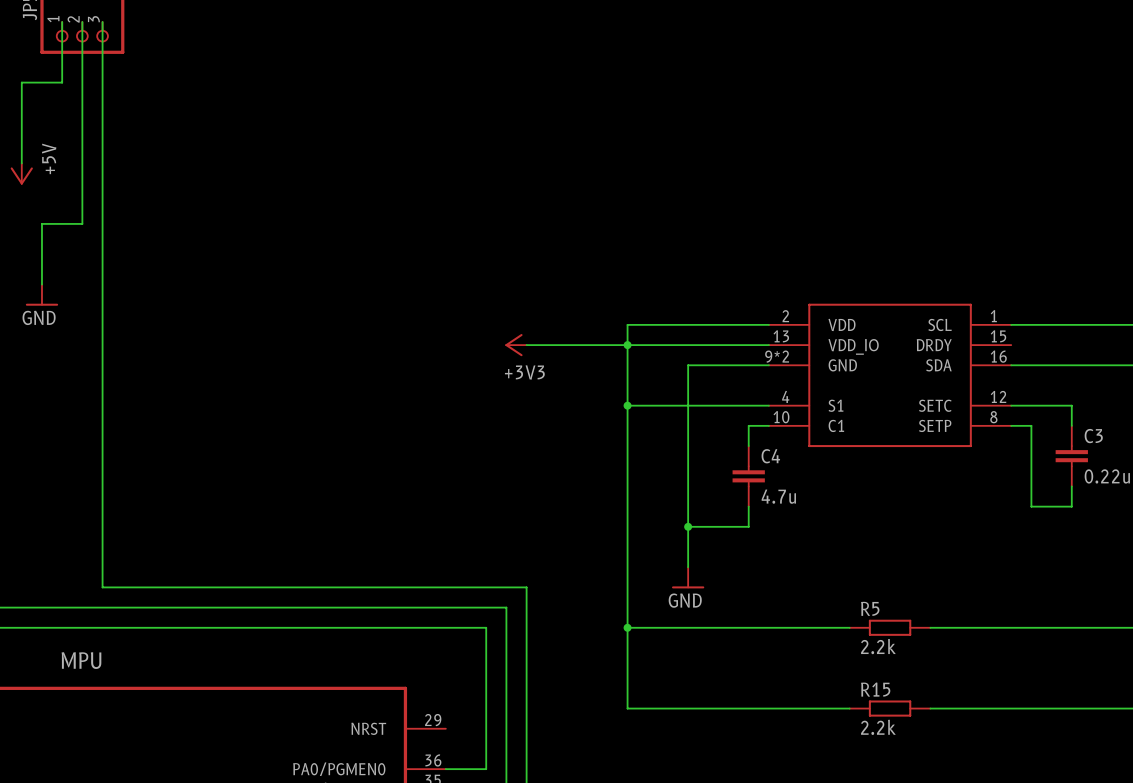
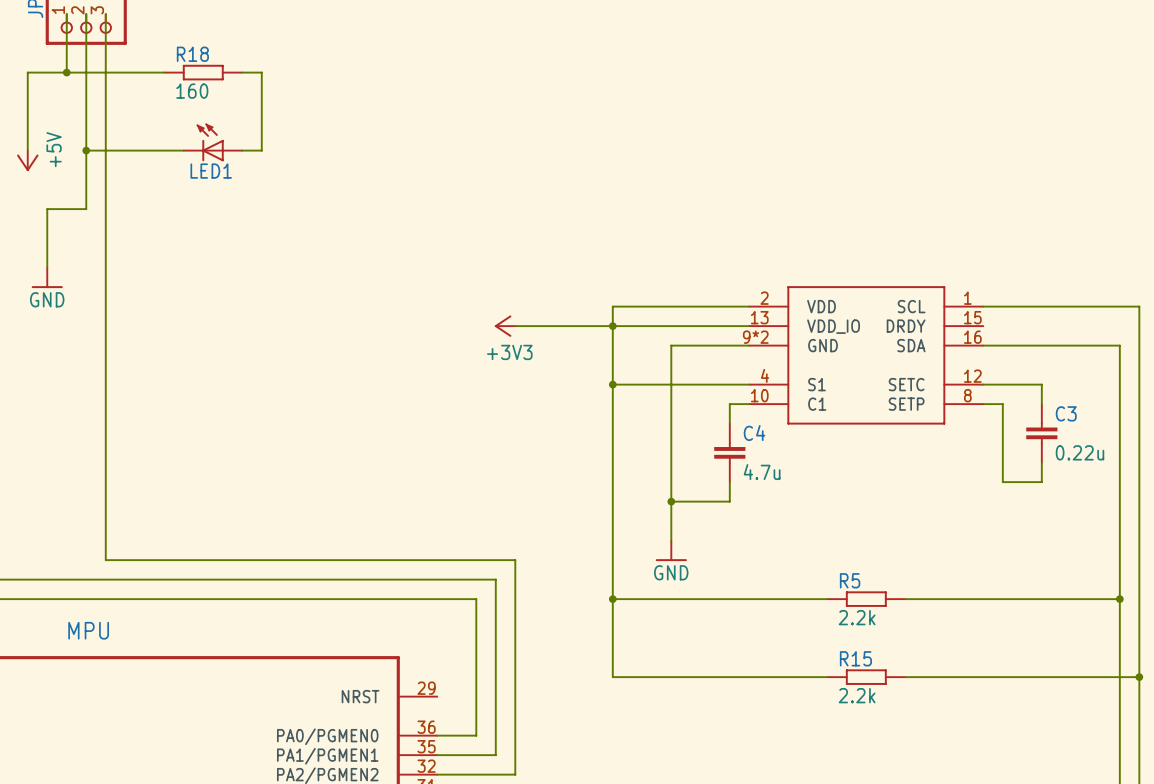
wire: none -> (66, 72) (164, 72)
junction: none -> (66, 72)
R18: none -> 160 (203, 72)
wire: none -> (242, 72) (261, 72) (261, 150) (242, 150)
LED1: none -> (213, 142)
wire: none -> (86, 150) (183, 150)
junction: none -> (86, 150)

